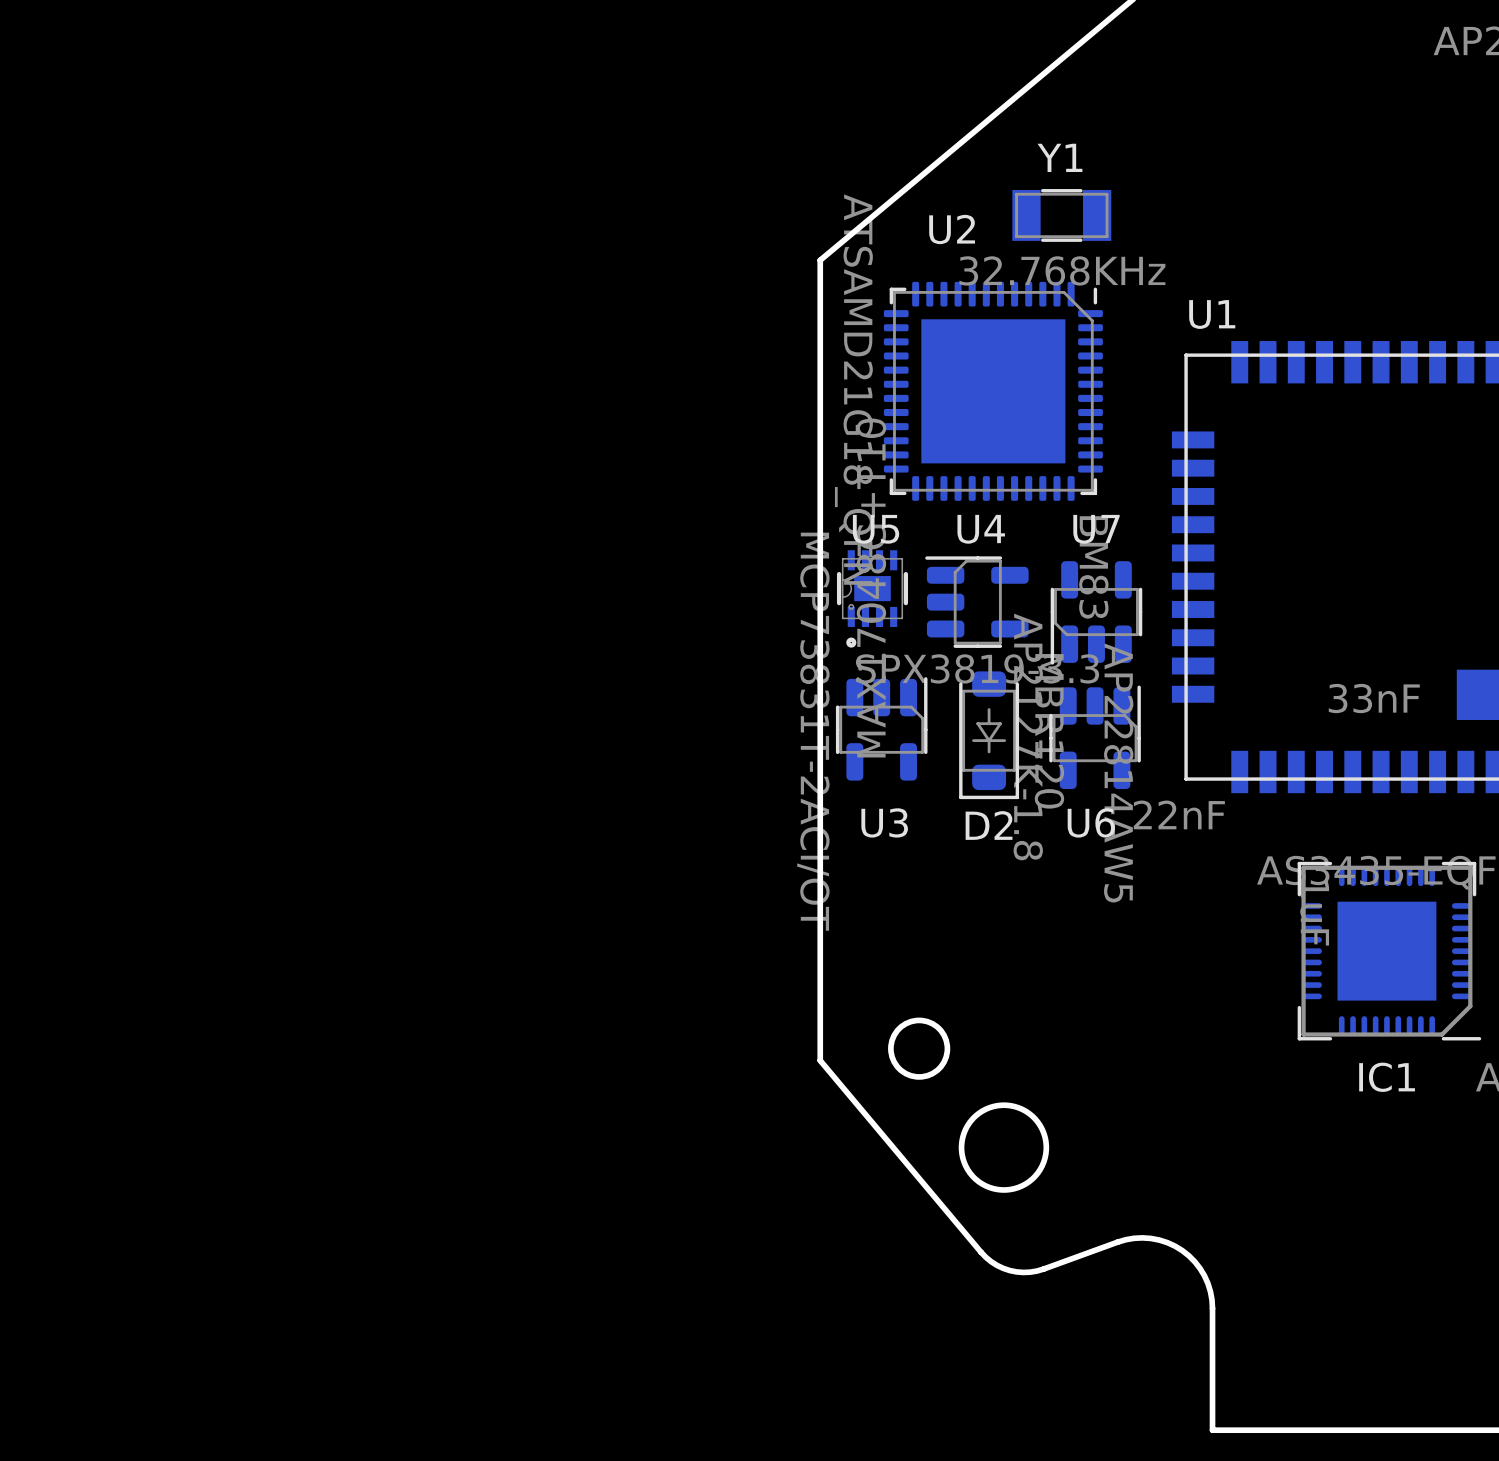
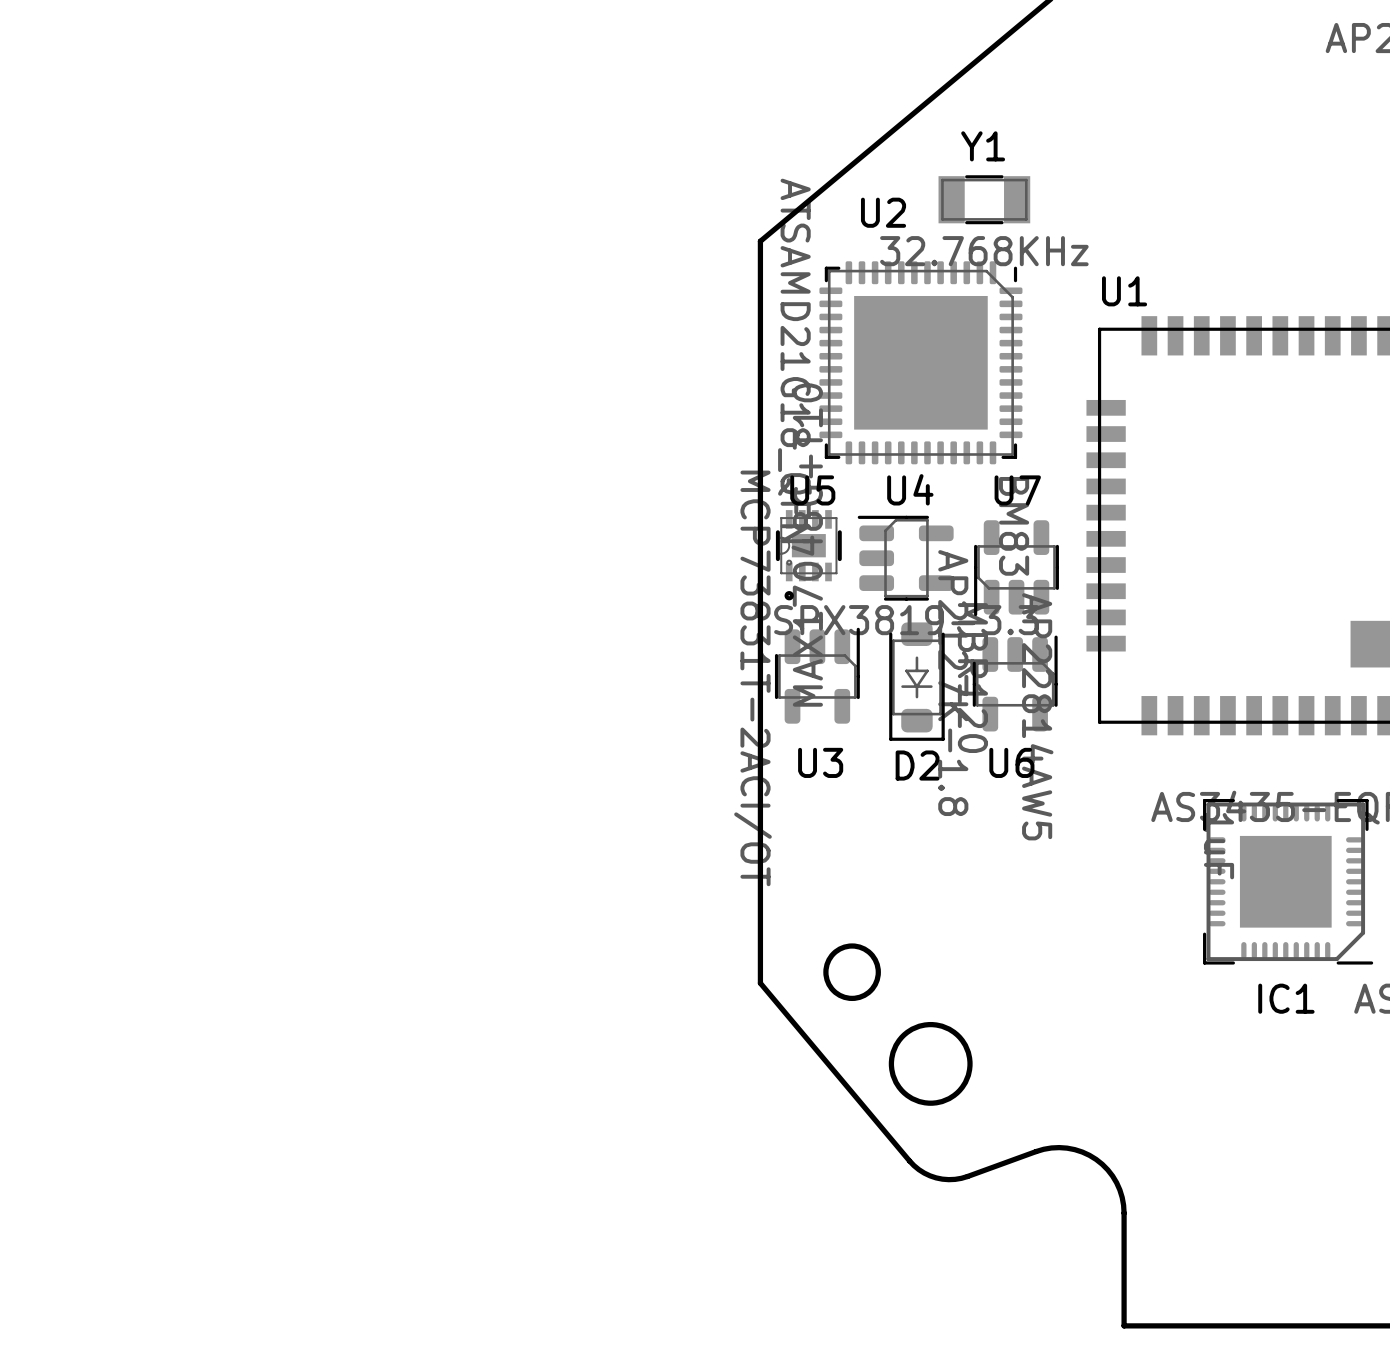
part: 33nF (1374, 698) -> none
part: 22nF (1179, 814) -> none

